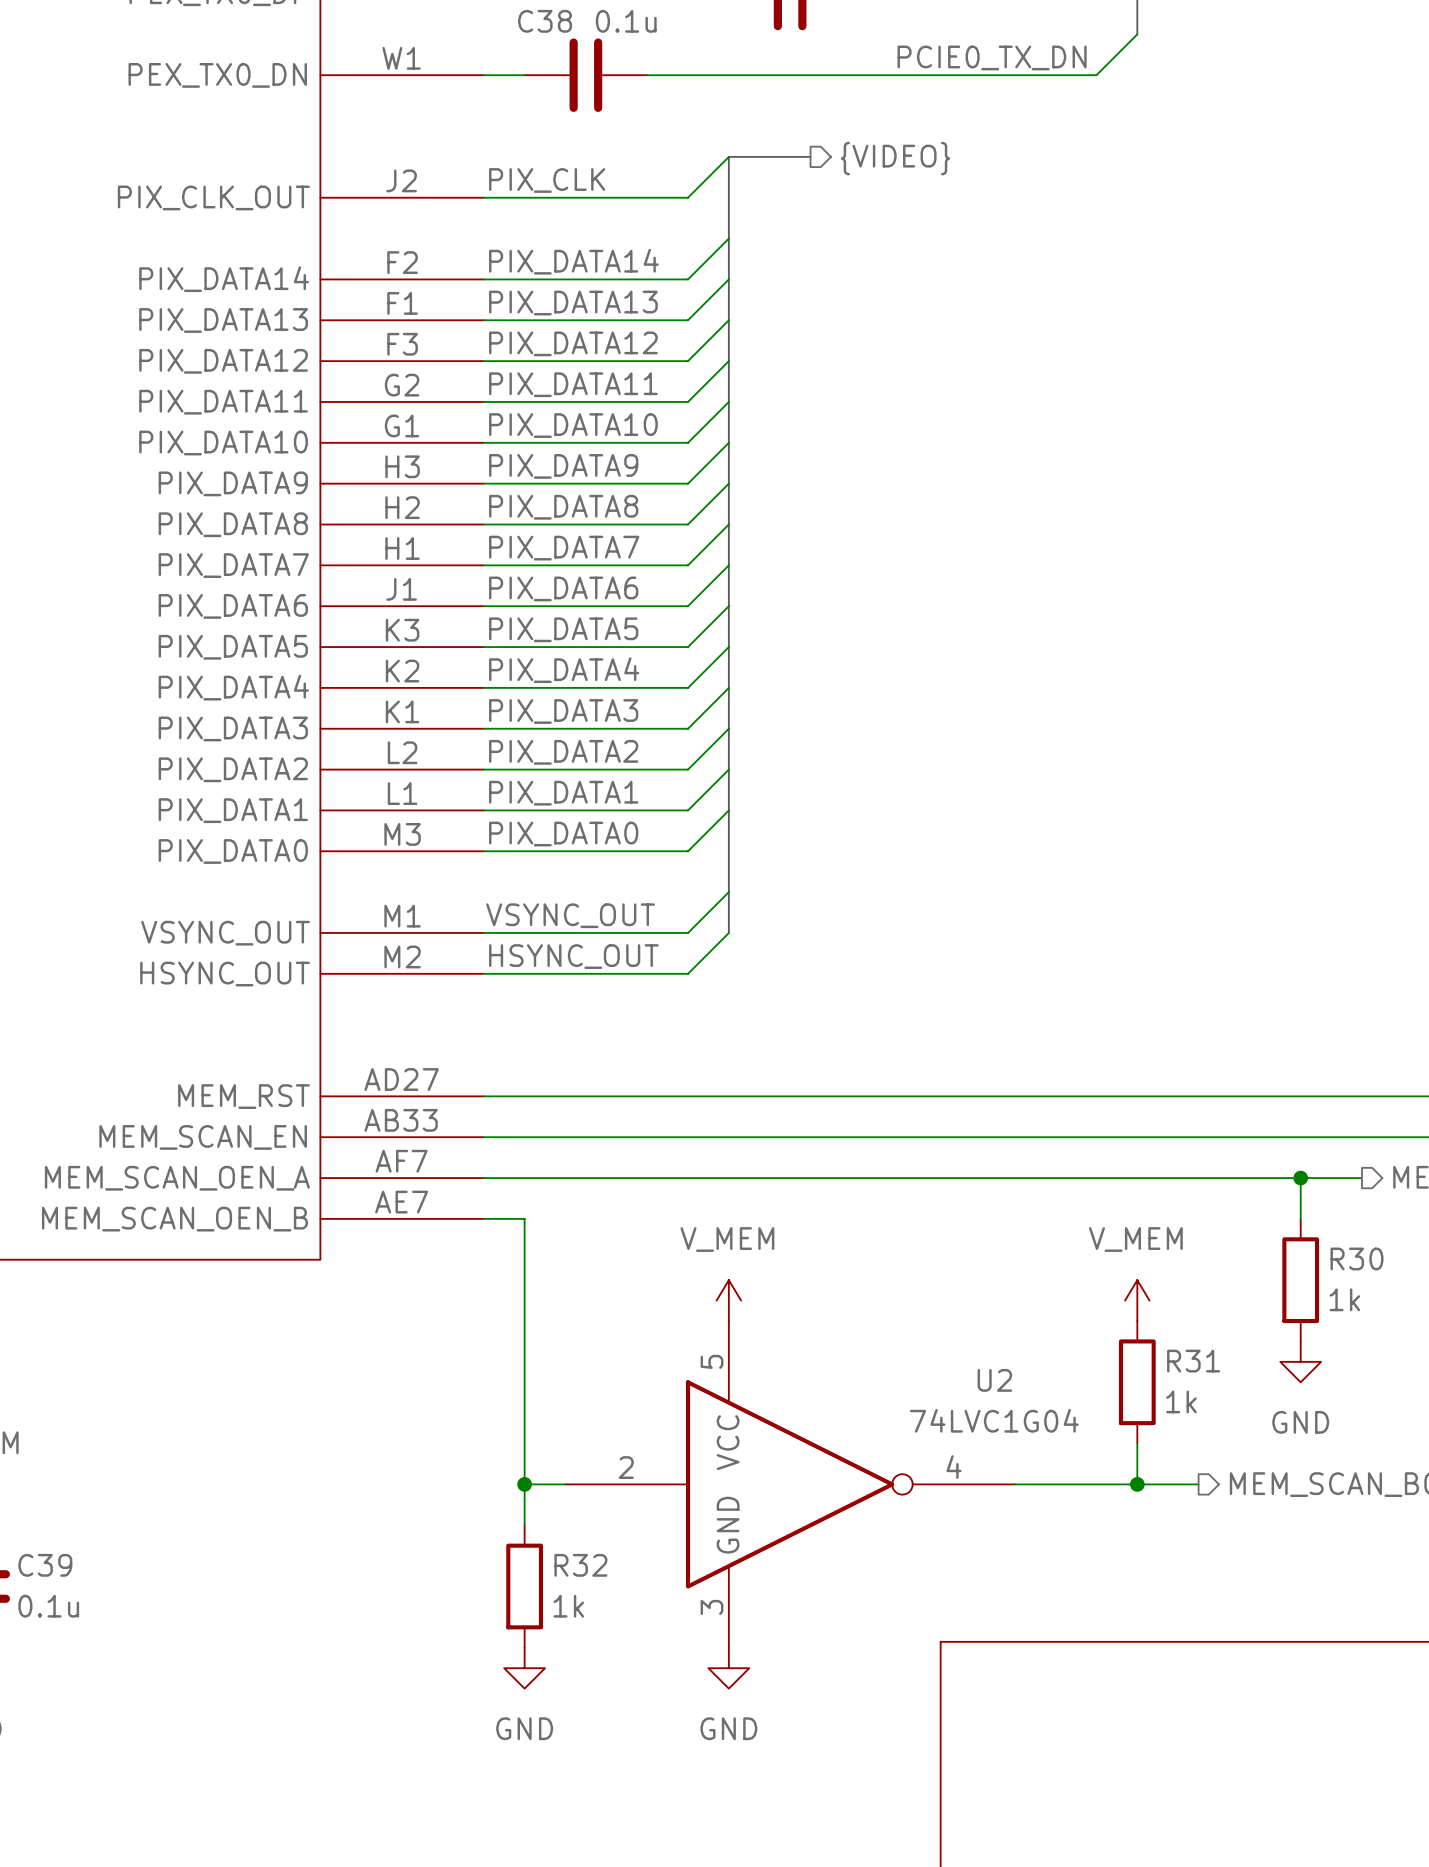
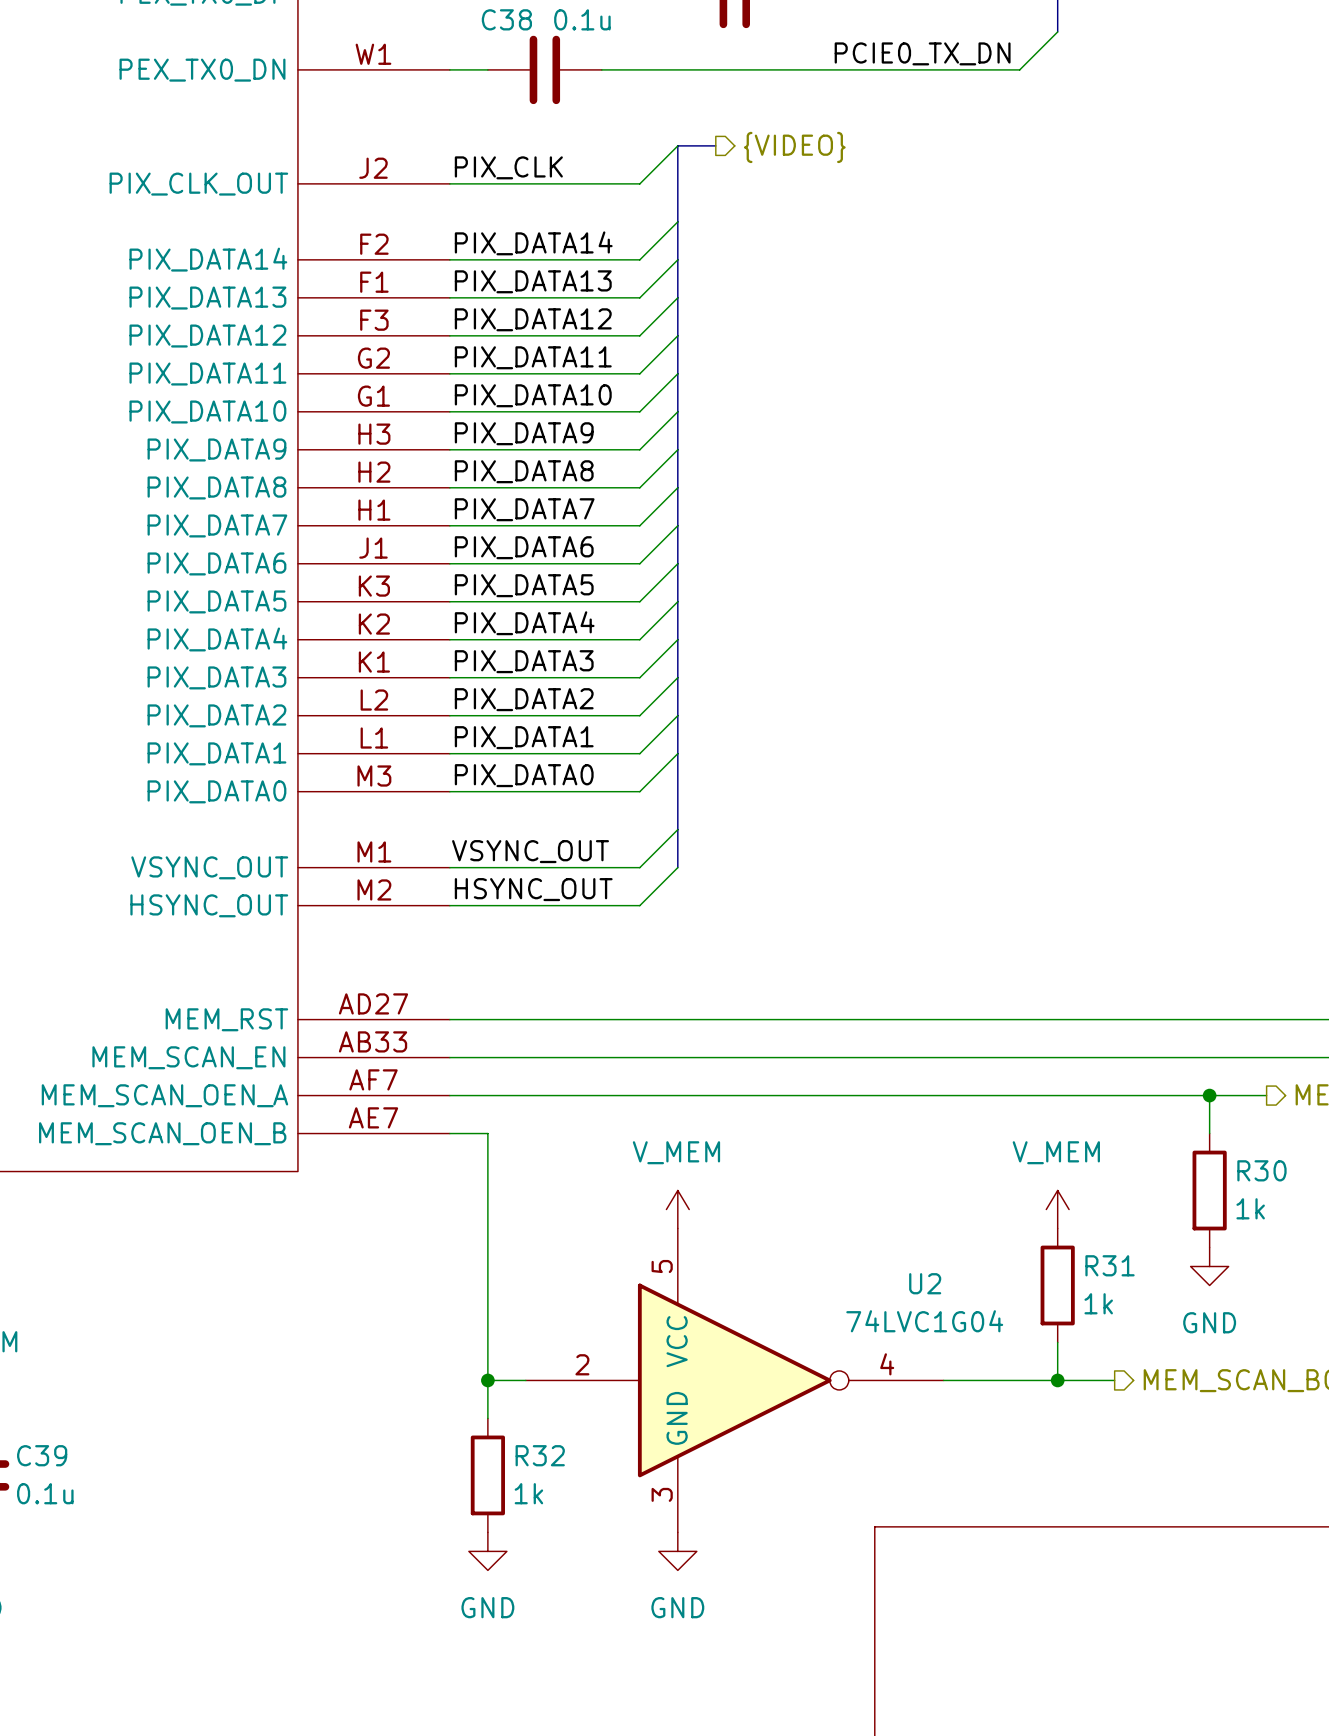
bus: (769, 156) (810, 156) -> none
hierarchical label position: {VIDEO} (895, 158) -> {VIDEO} (794, 147)

